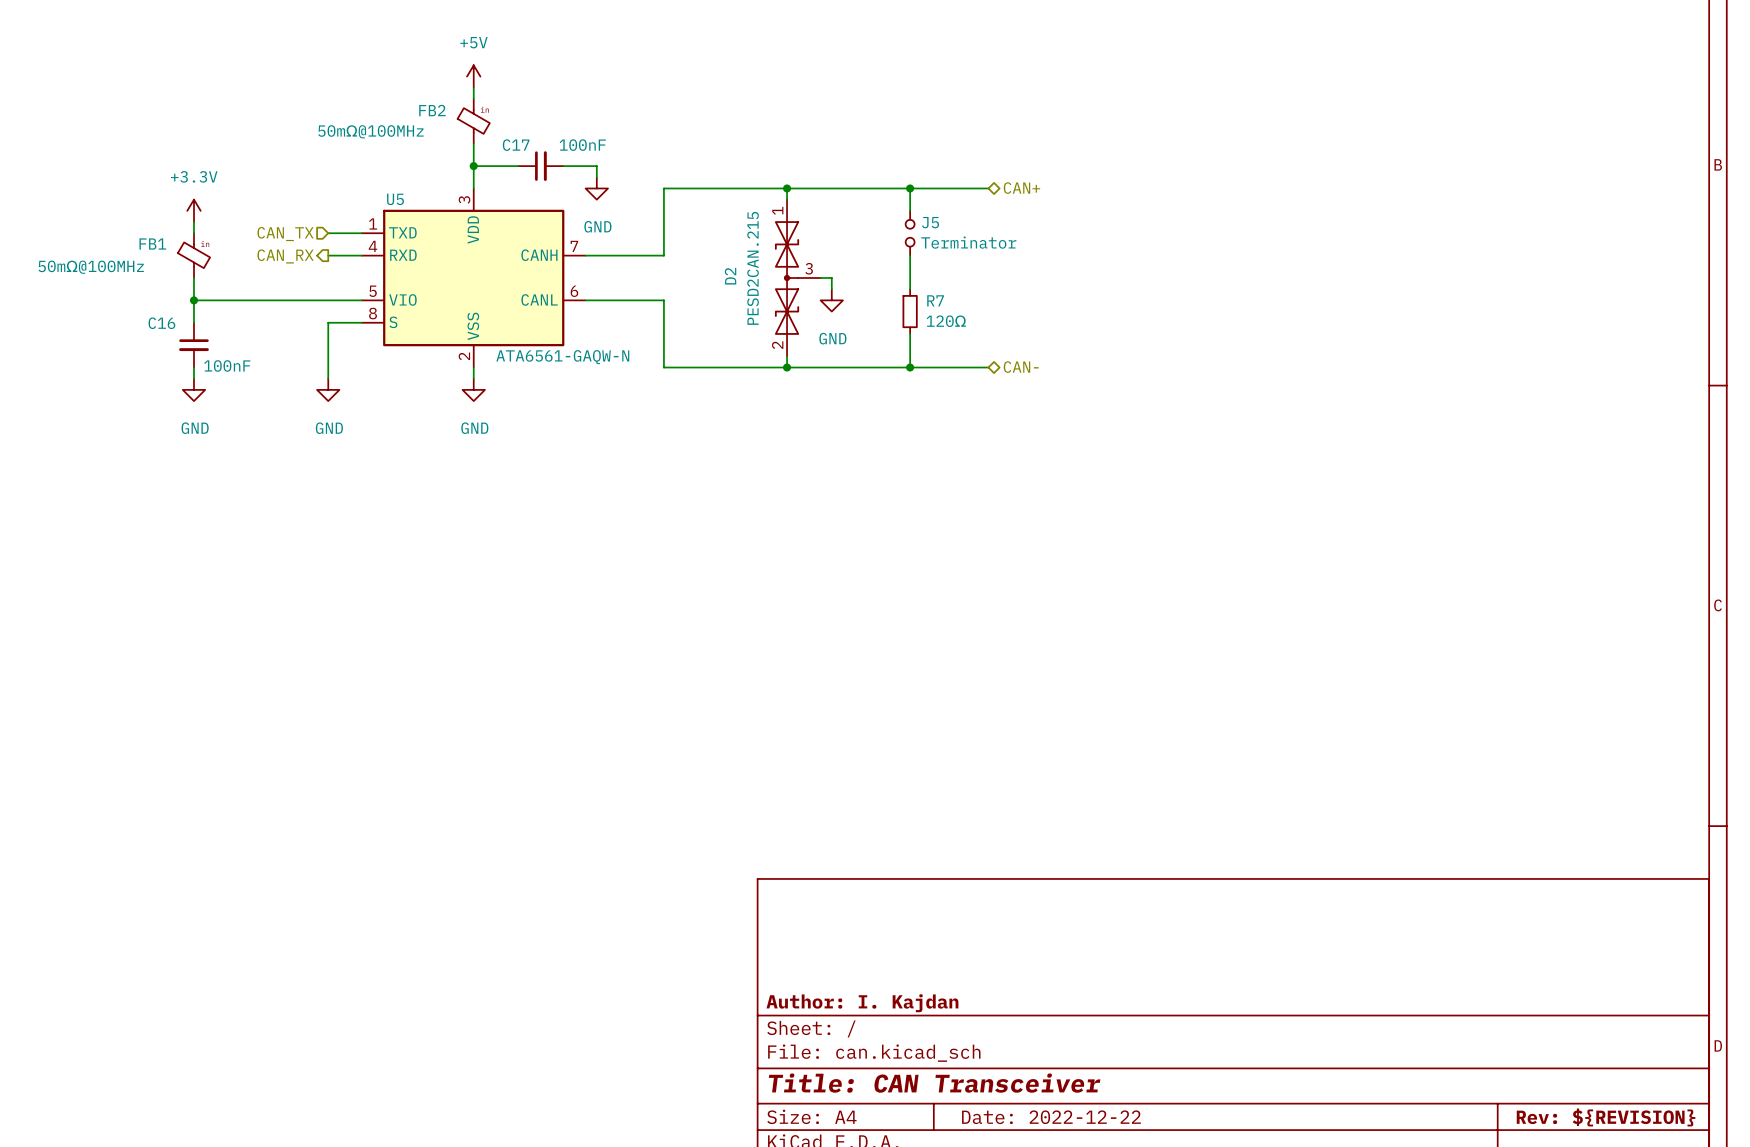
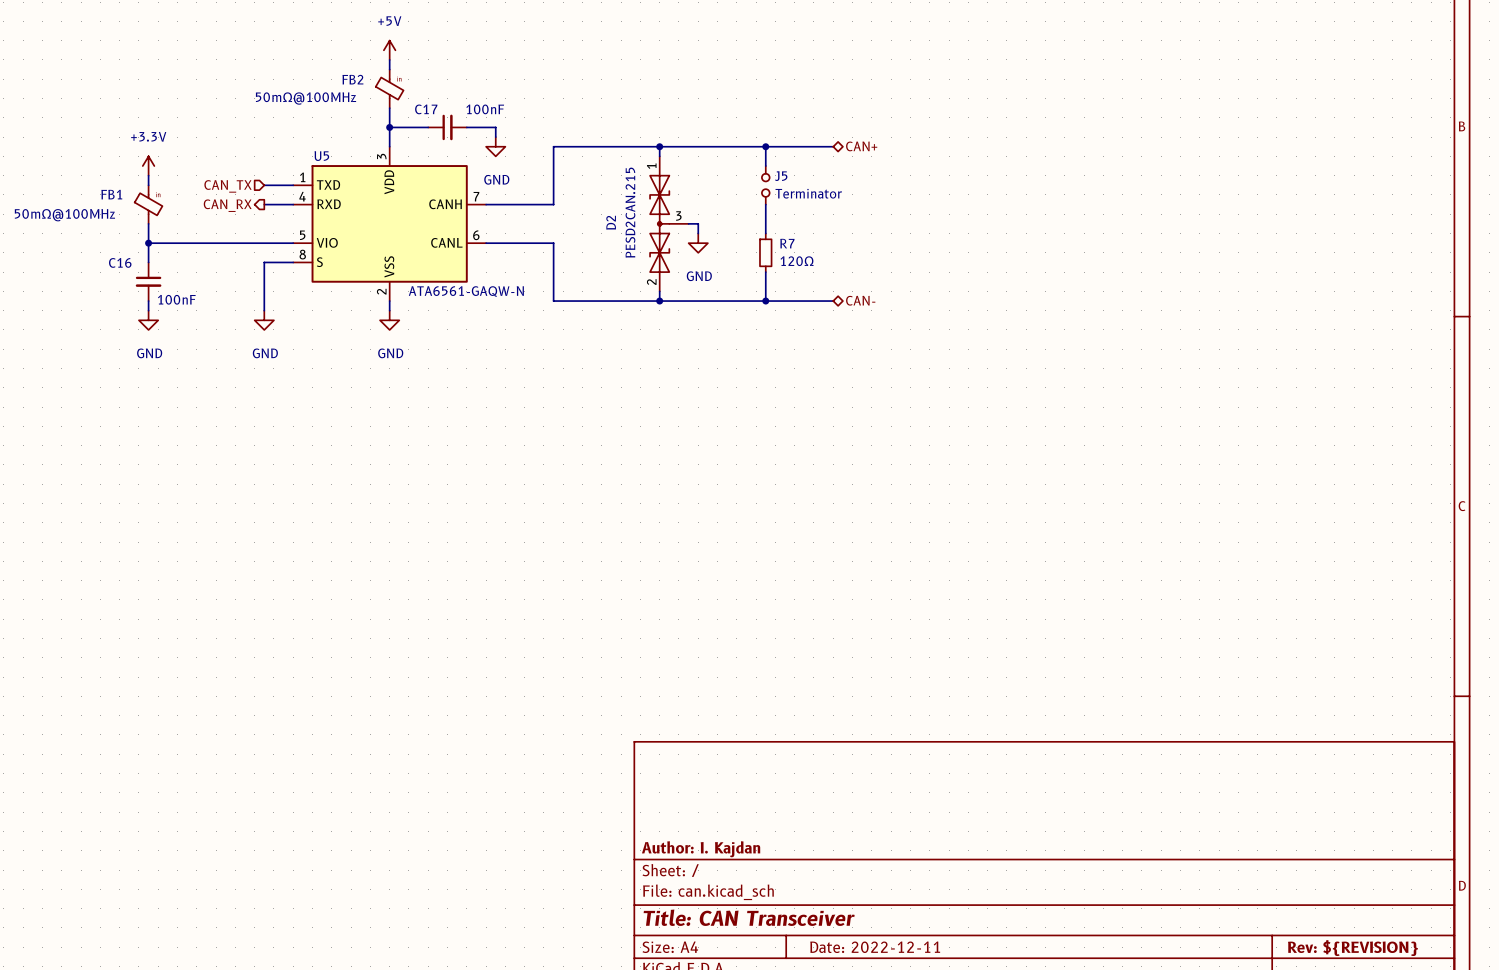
title block: Date: 2022-12-22 (1051, 1117) -> Date: 2022-12-11 (875, 947)

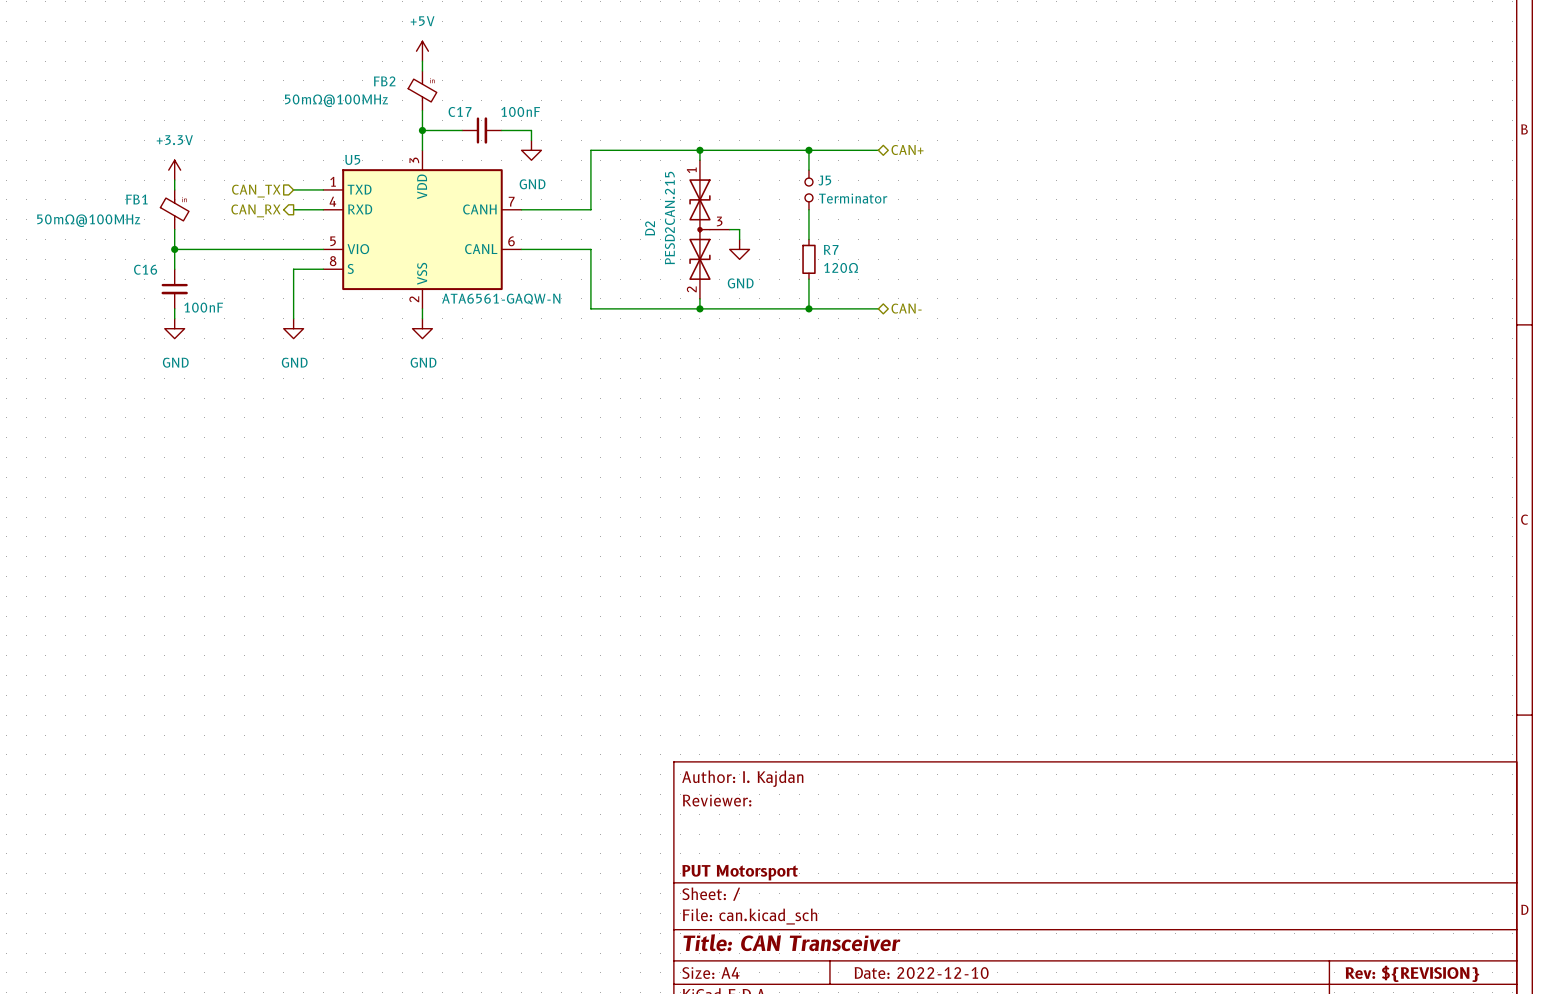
title block: none -> Author: I. Kajdan (742, 778)
title block: none -> Reviewer: (717, 800)
title block: Author: I. Kajdan (701, 849) -> PUT Motorsport (740, 872)
title block: Date: 2022-12-11 (875, 947) -> Date: 2022-12-10 (921, 973)

